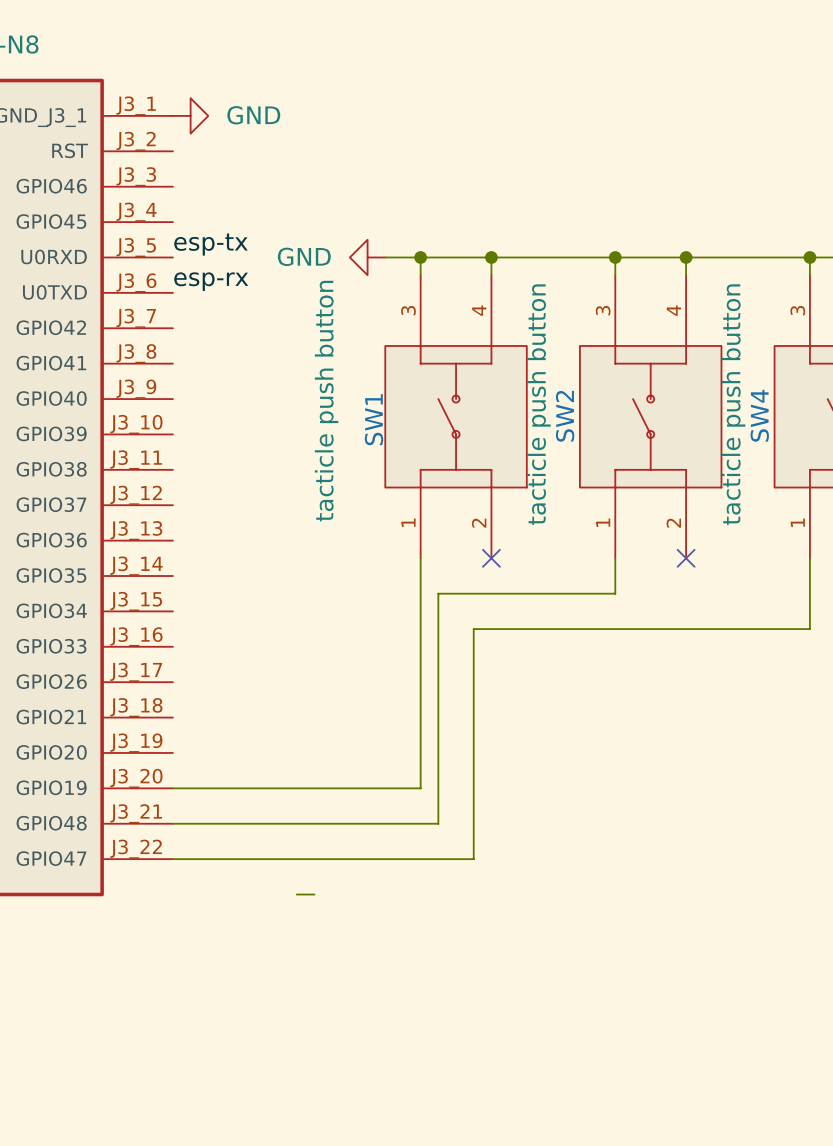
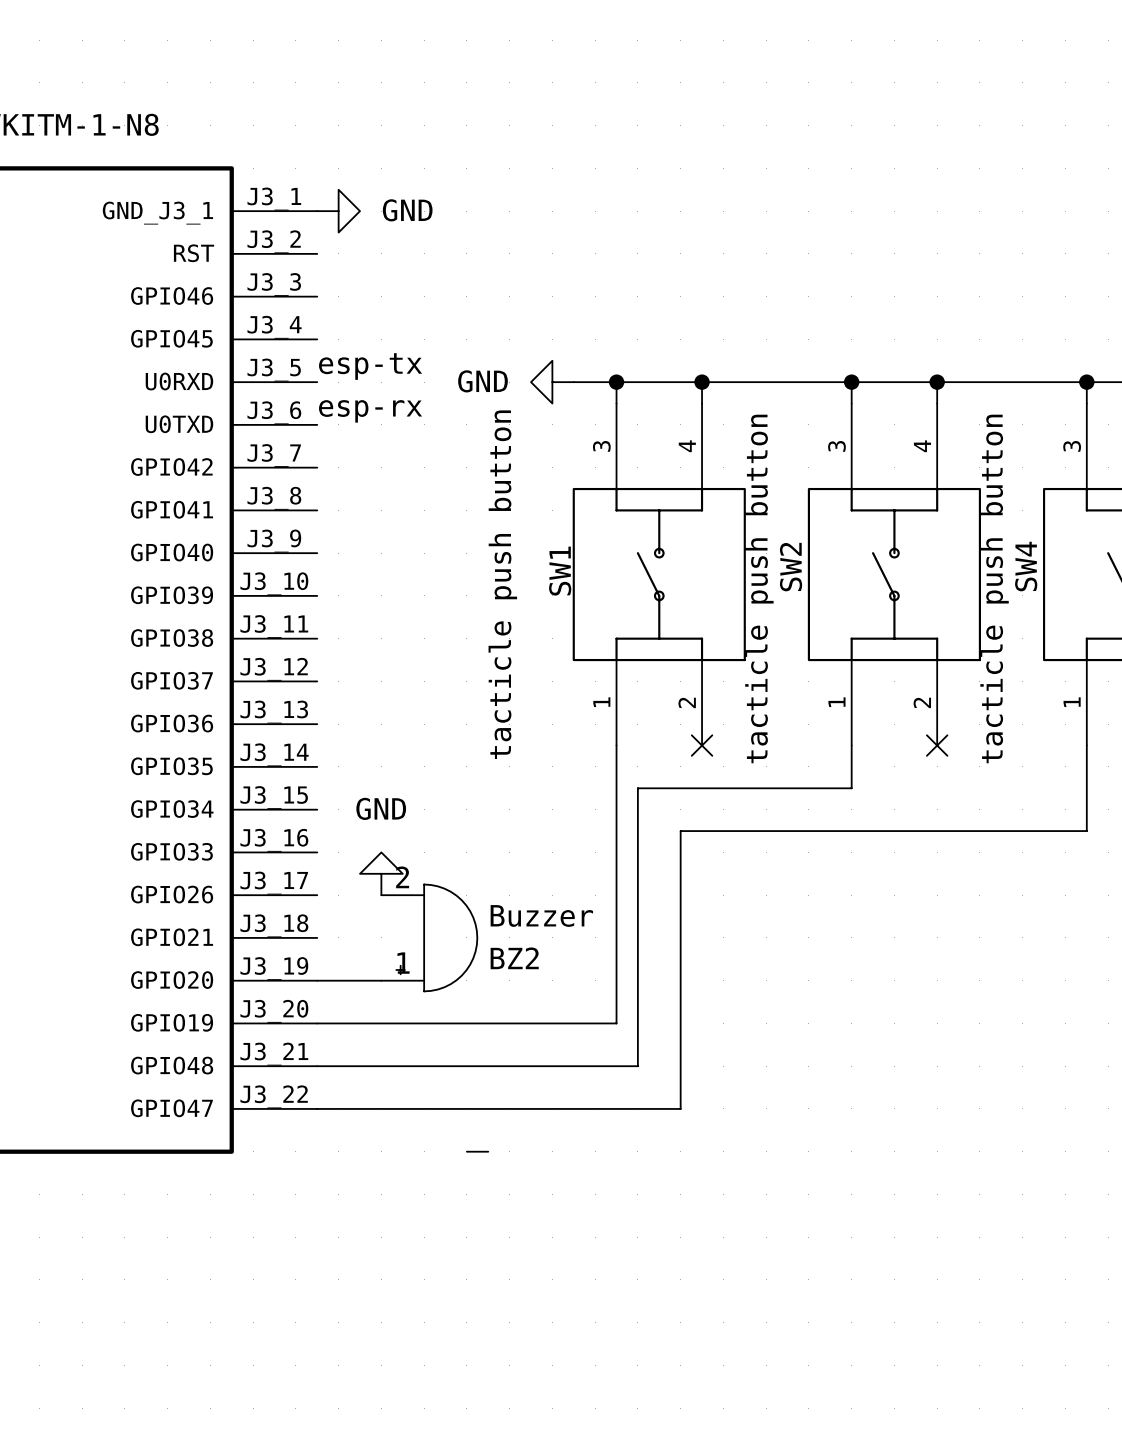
power symbol: none -> GND (381, 873)
BZ2: none -> Buzzer (429, 937)
wire: none -> (317, 980) (381, 980)

